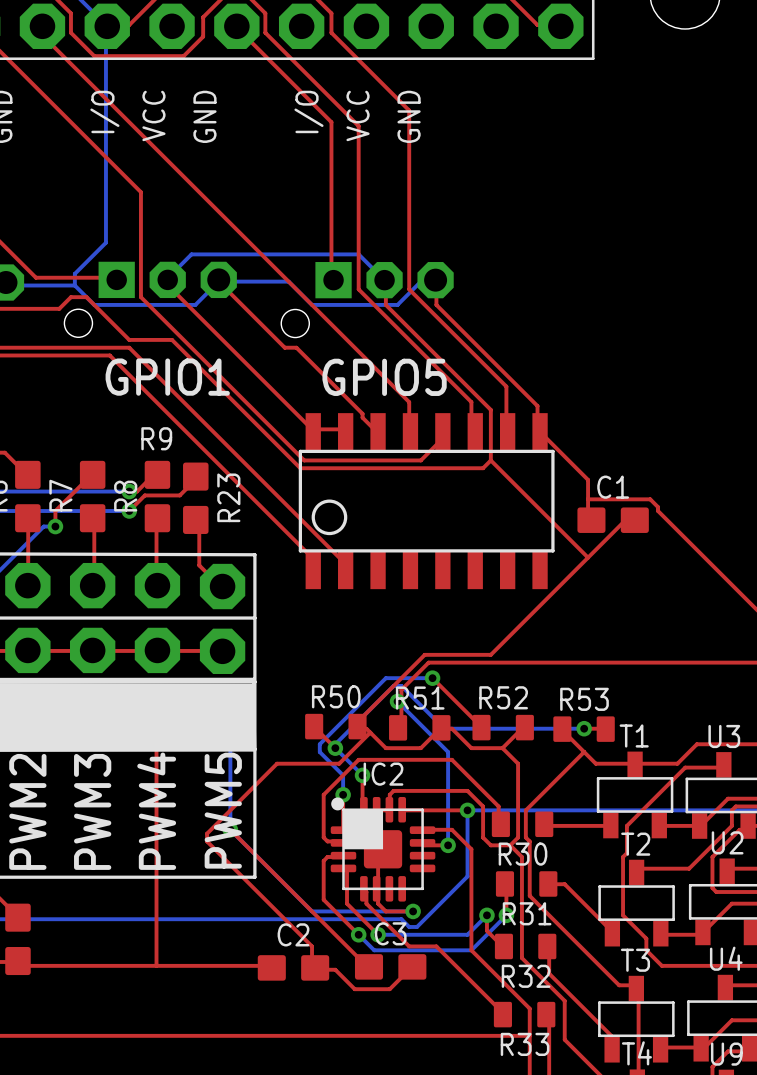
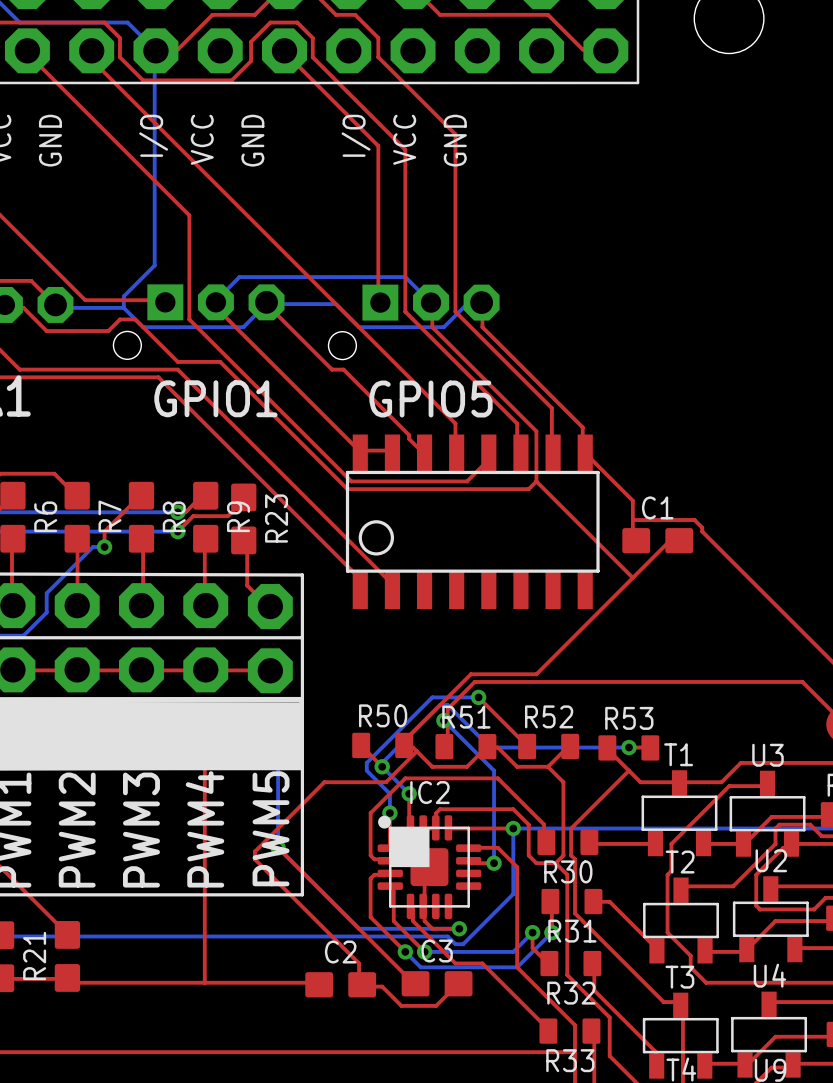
R9 name rotation: 0° (156, 438) -> 90° counterclockwise (238, 516)
R9 name position: R9 (156, 438) -> R9 (238, 516)

